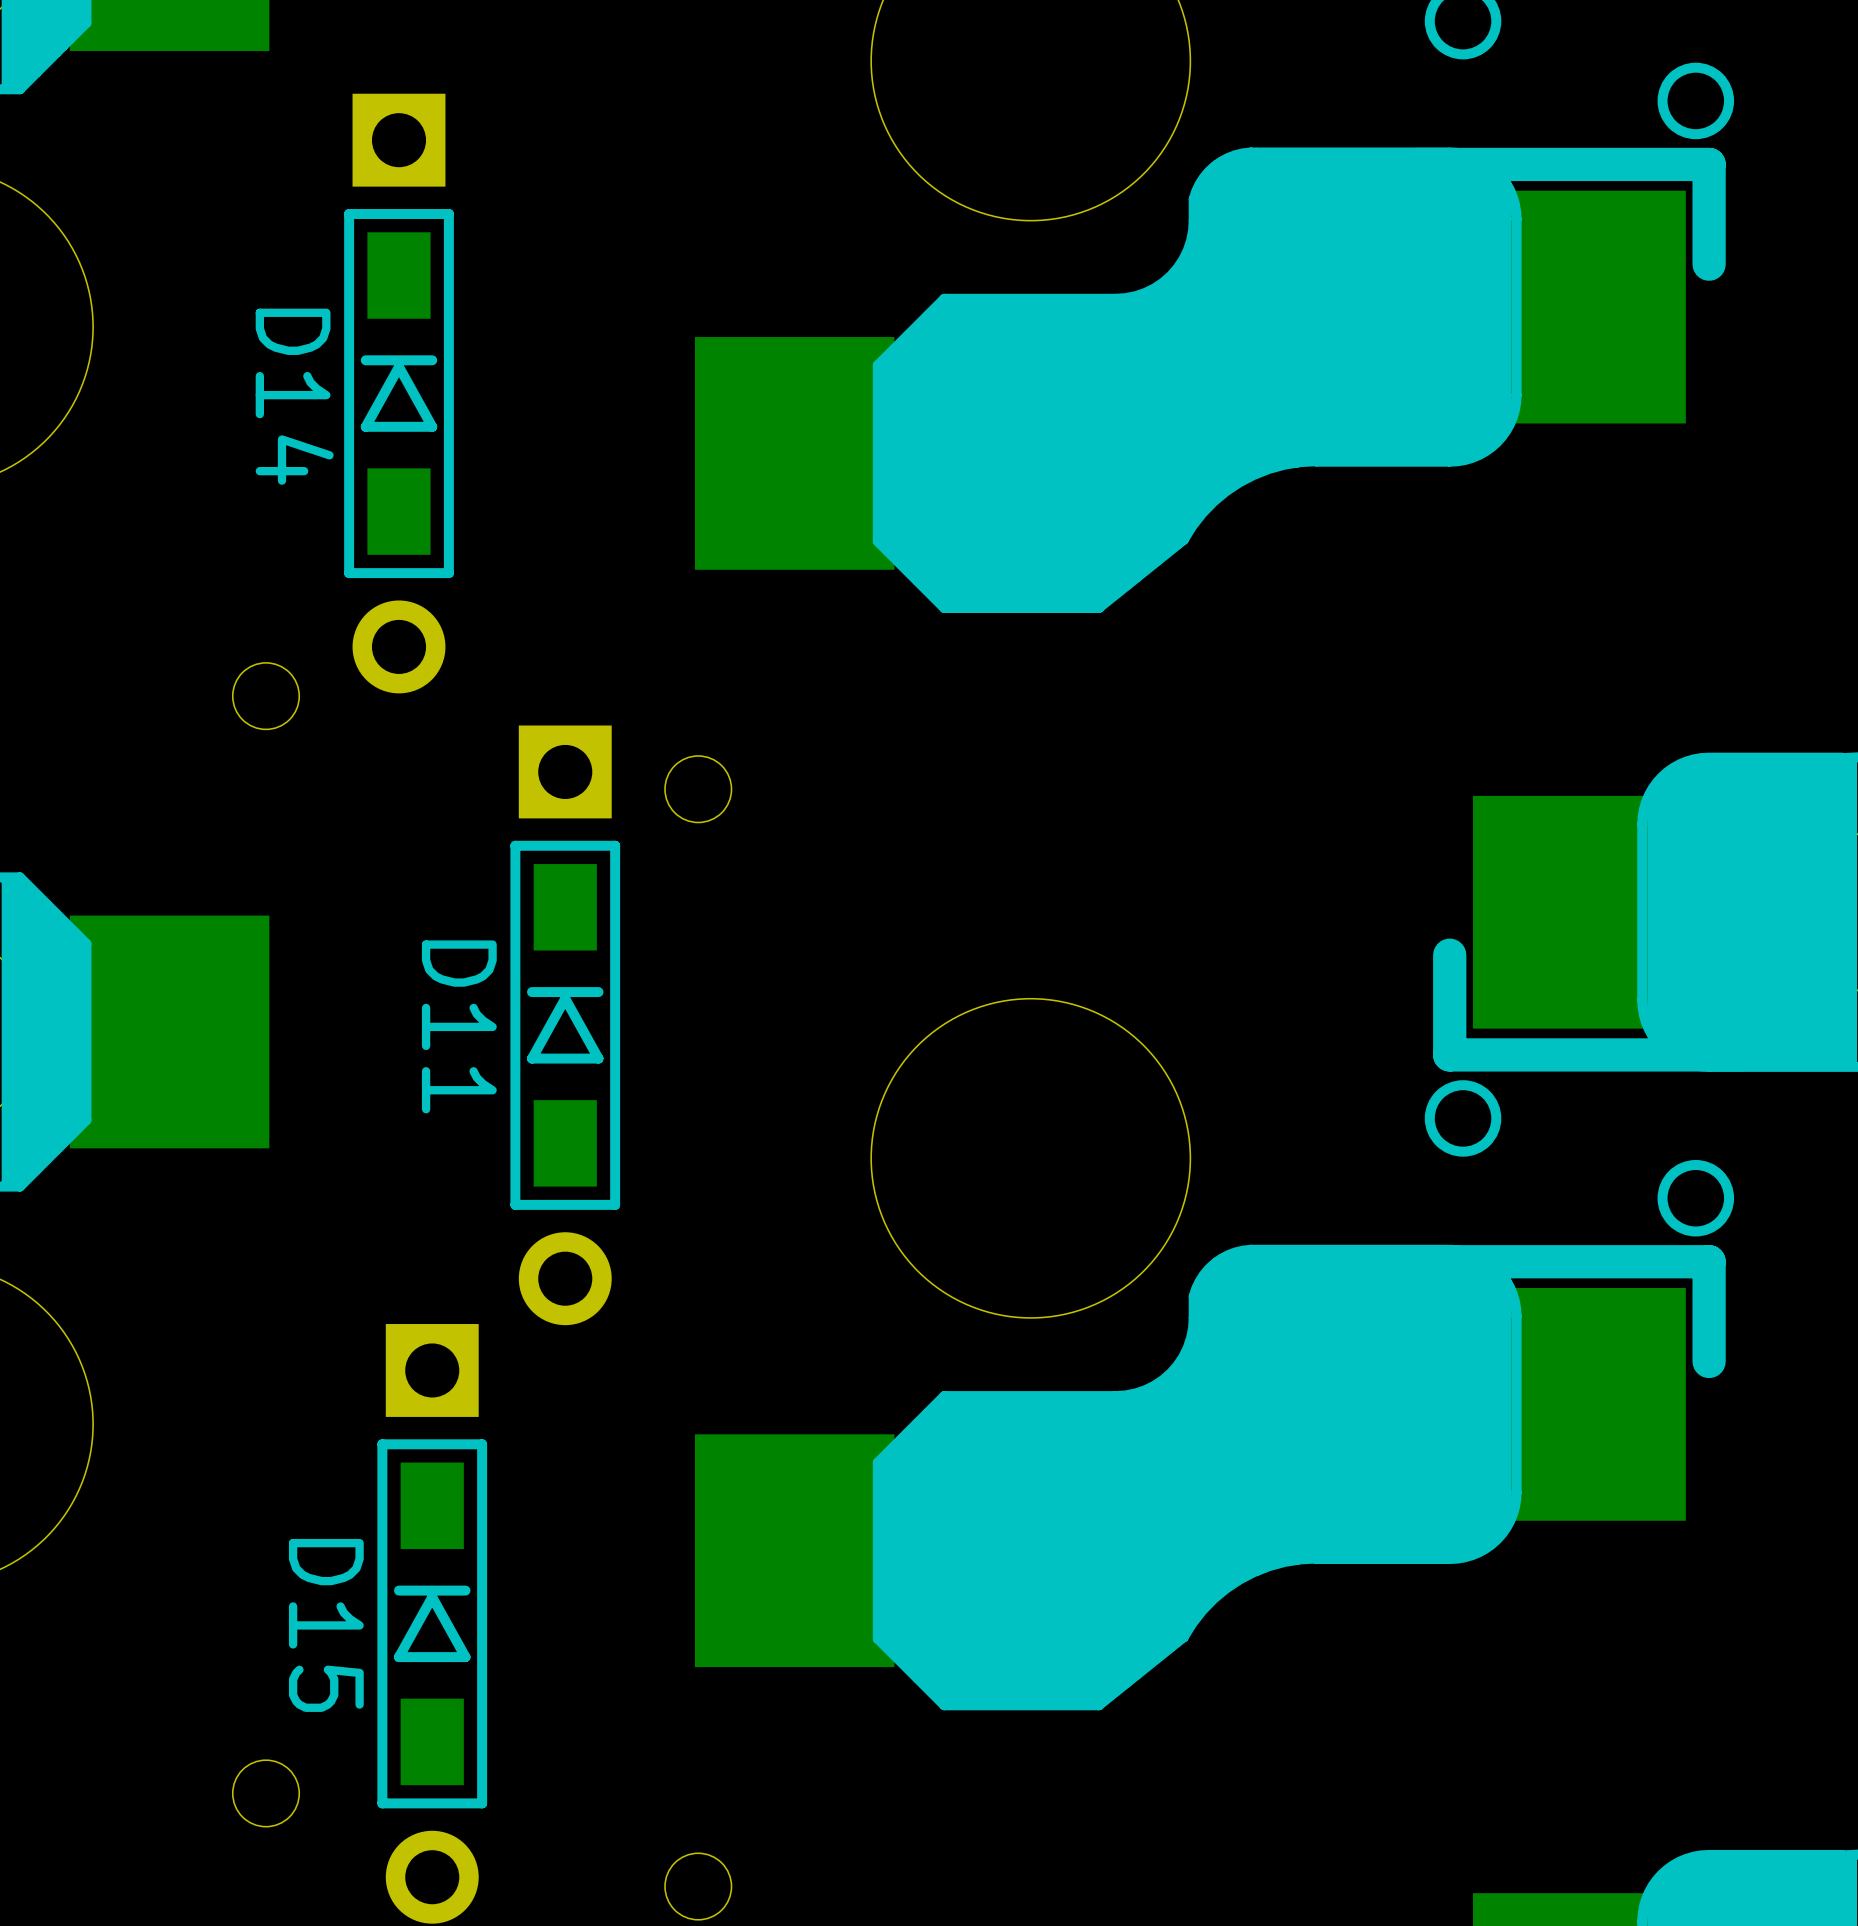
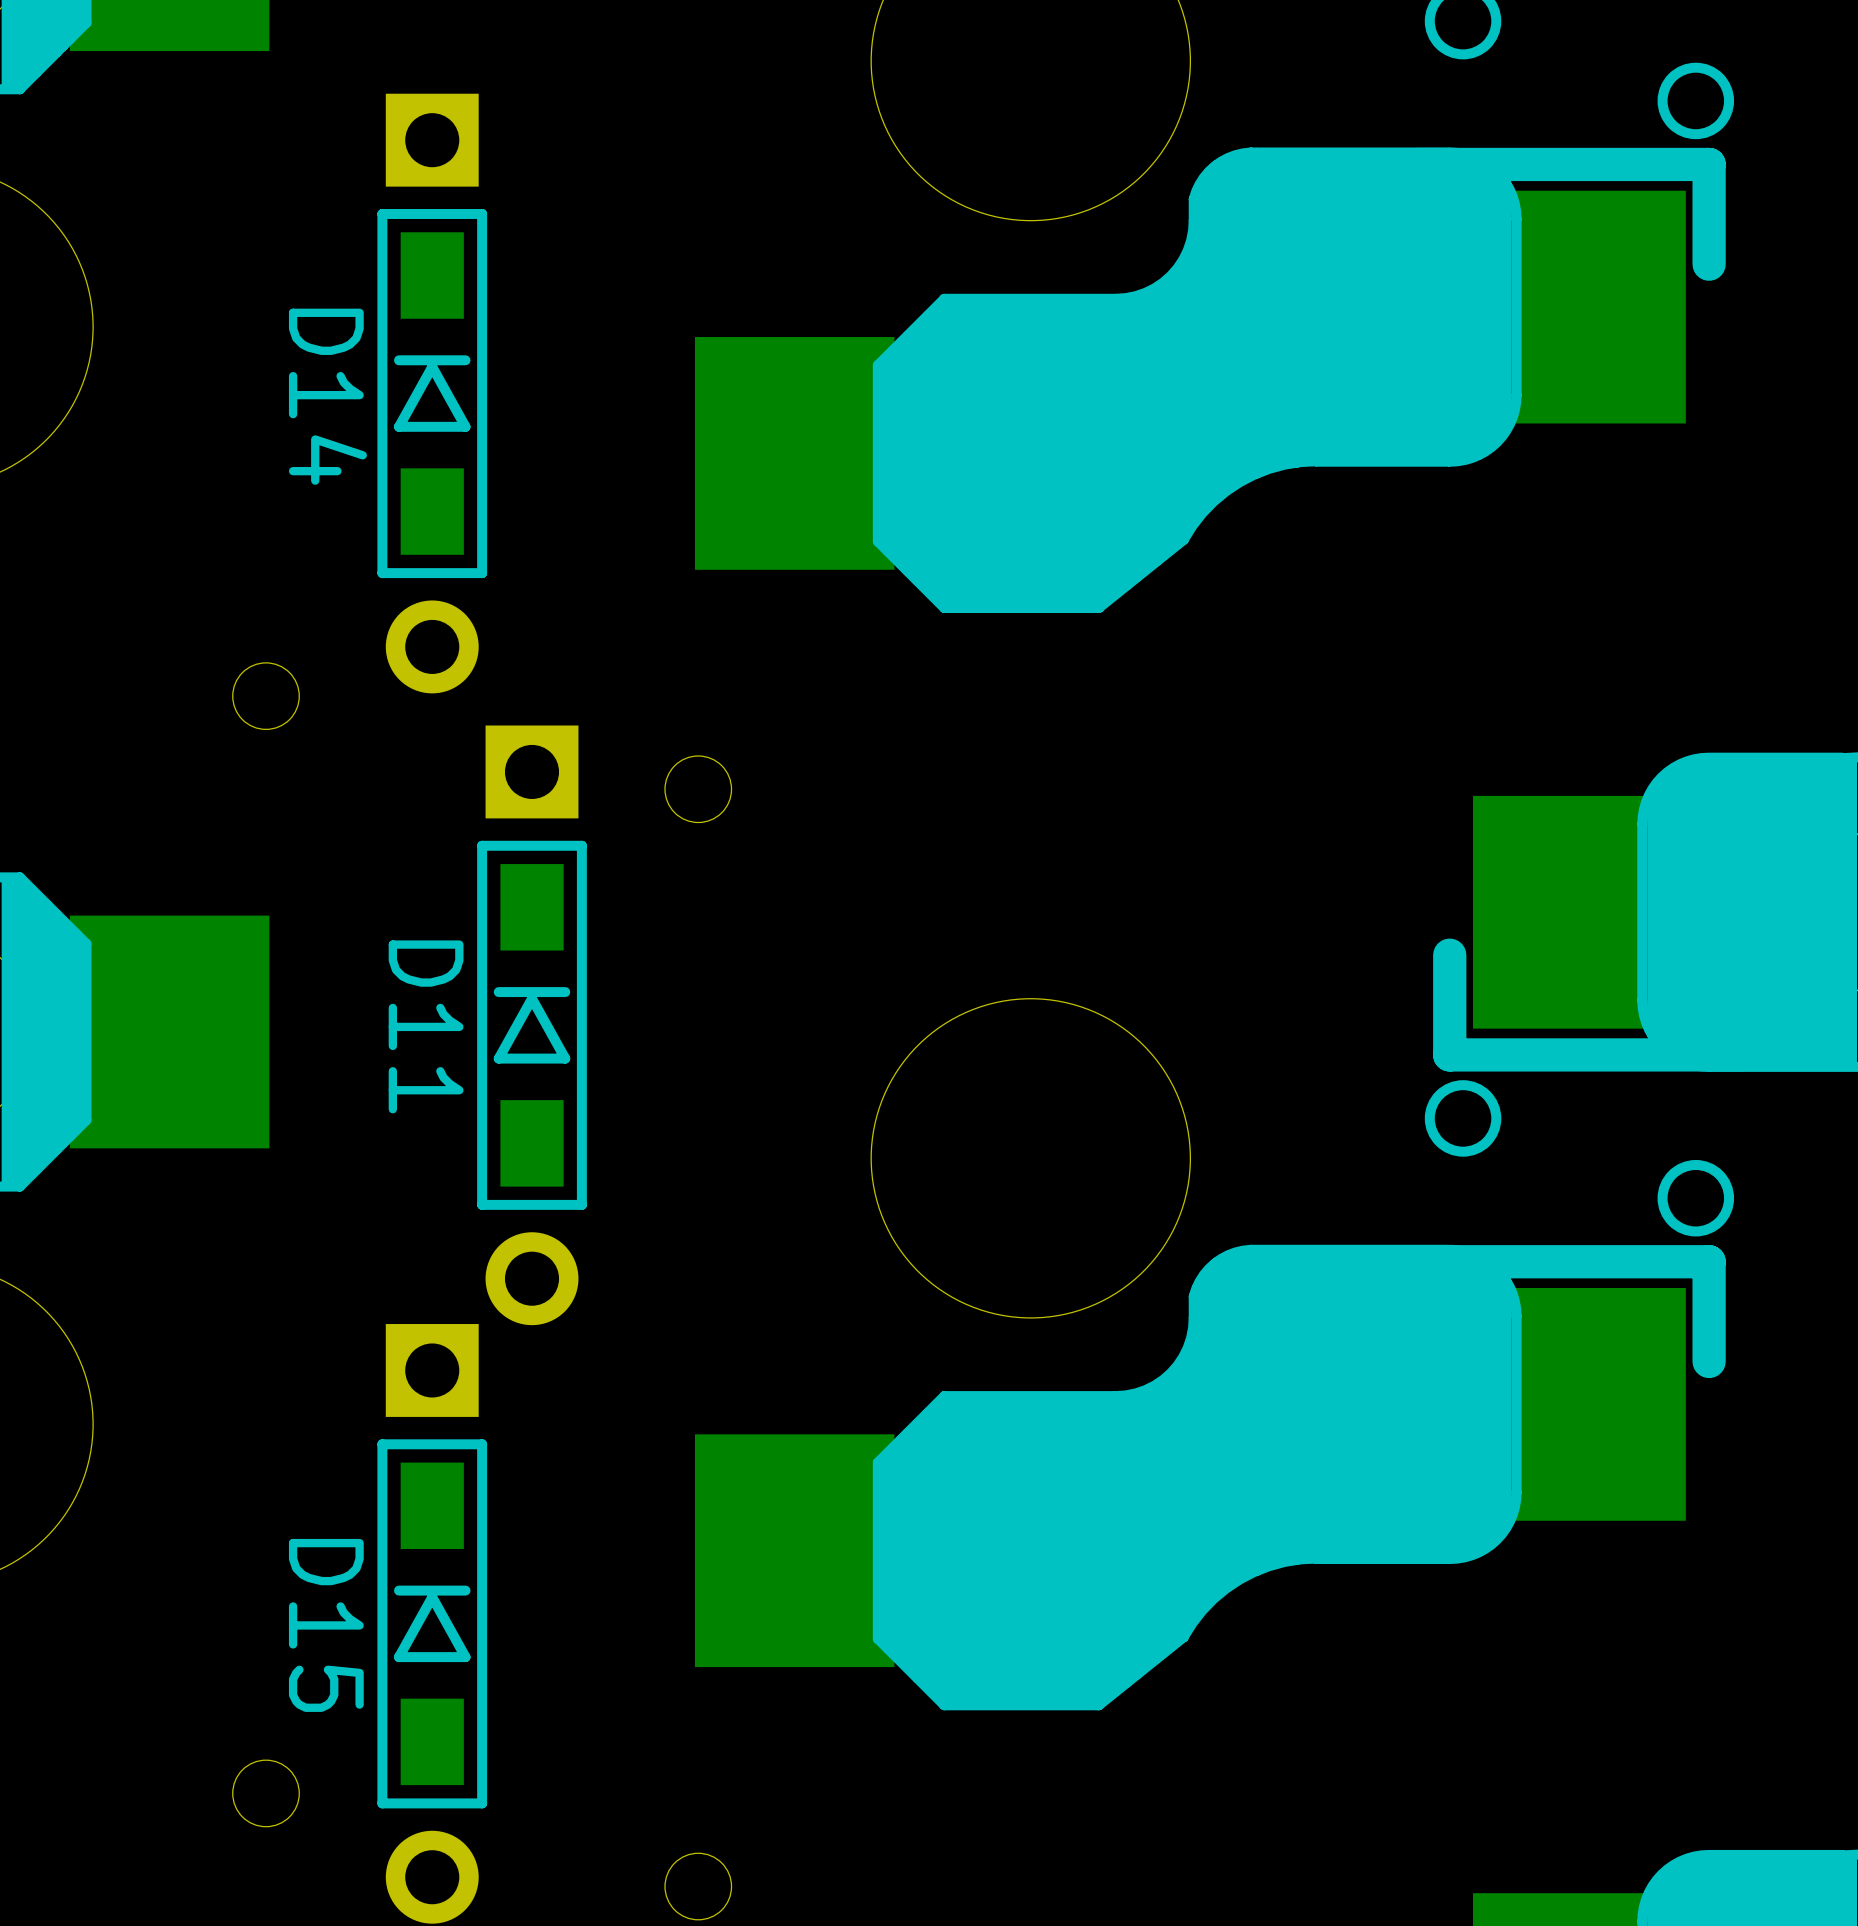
D14 position: (399, 393) -> (432, 393)
D11 position: (565, 1025) -> (532, 1025)

